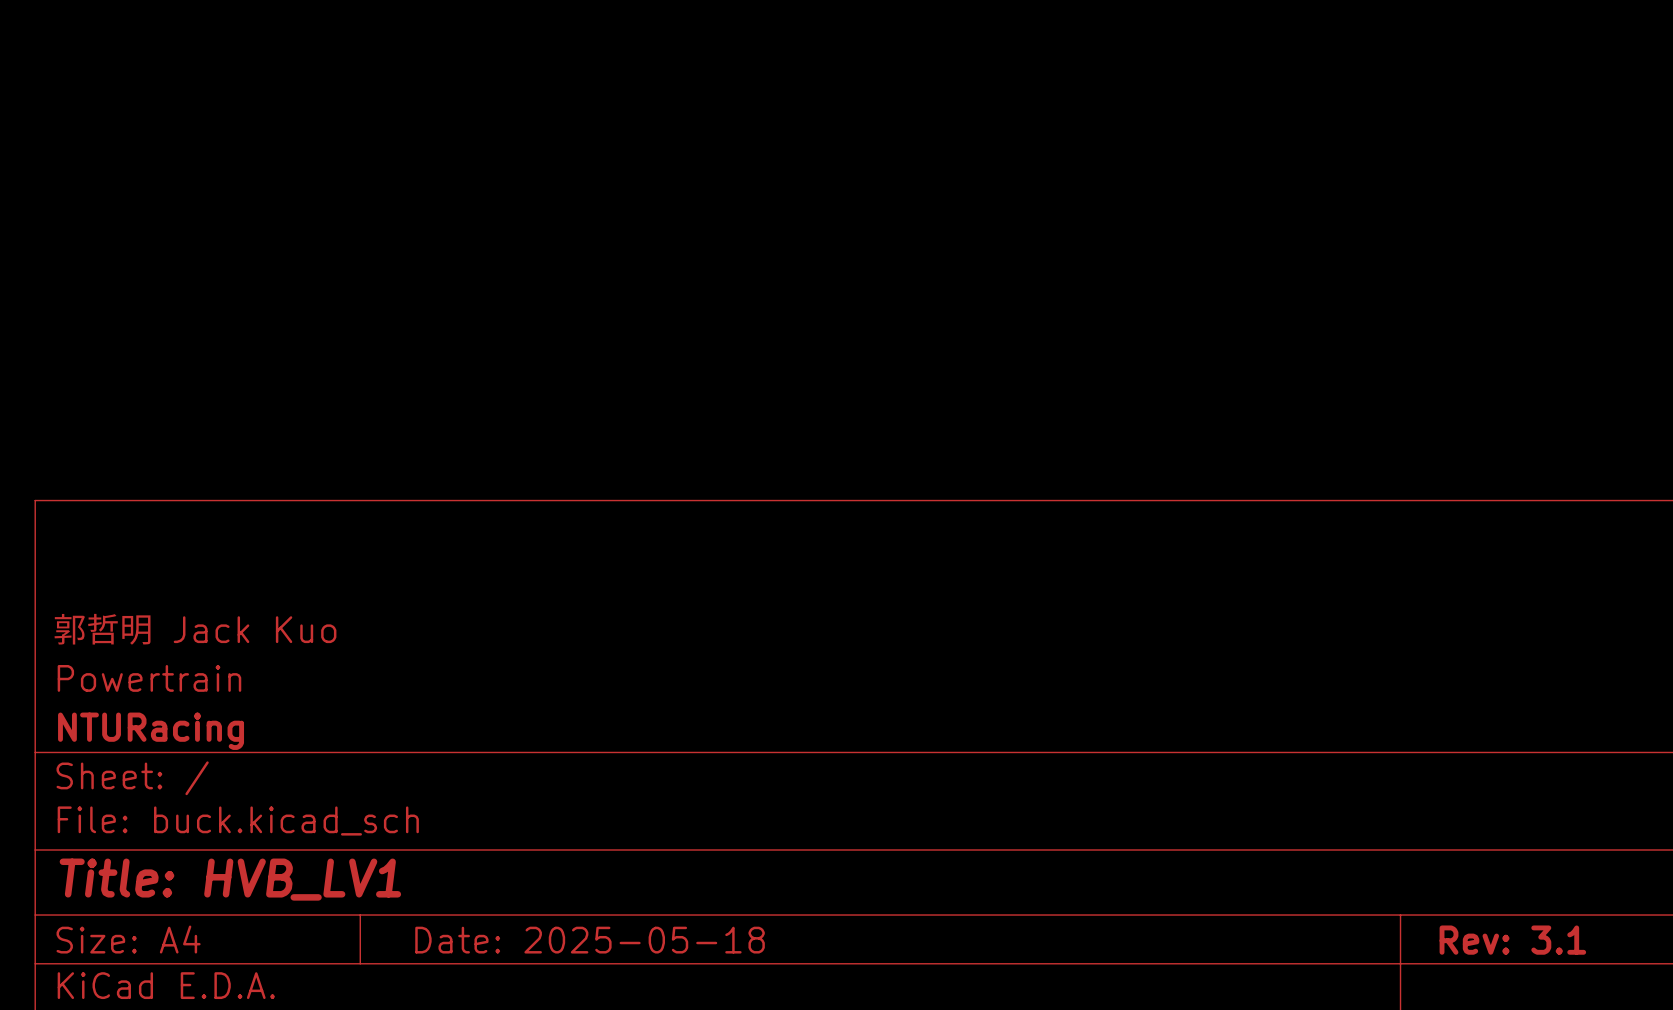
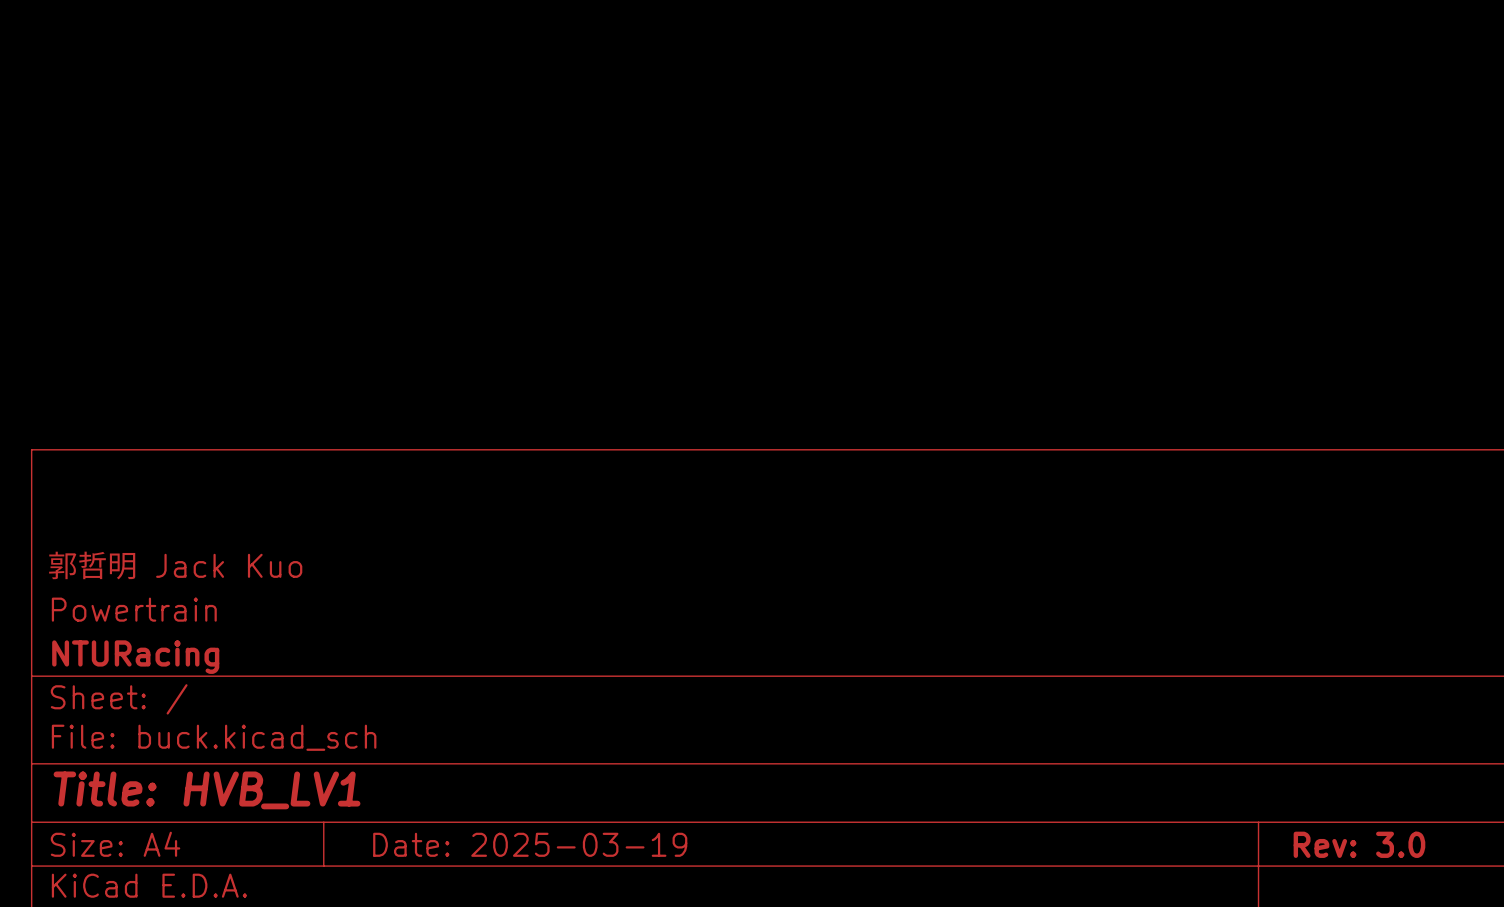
title block: Date: 2025-05-18 (590, 940) -> Date: 2025-03-19 (530, 844)
title block: Rev: 3.1 (1512, 940) -> Rev: 3.0 (1359, 844)

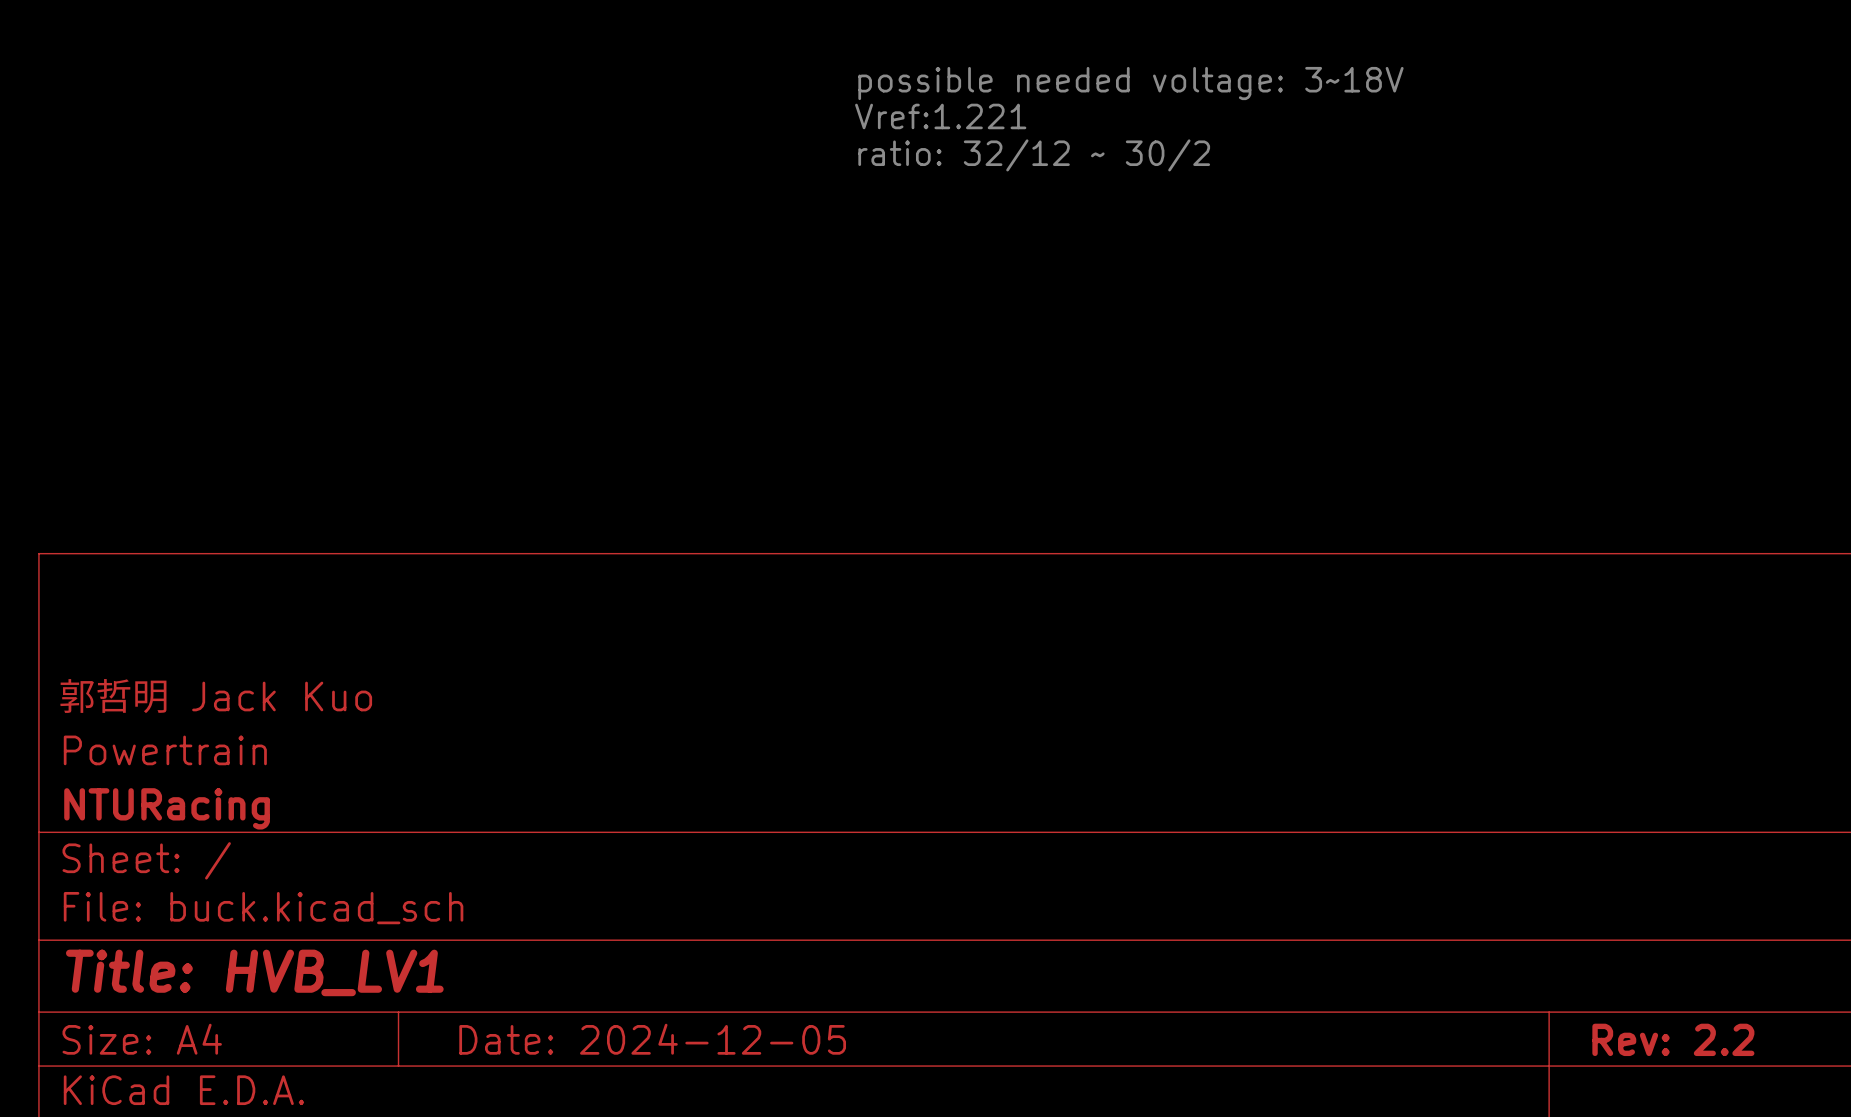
text: none -> possible needed voltage: 3~18V (1130, 83)
text: none -> Vref:1.221 (940, 116)
text: none -> ratio: 32/12 ~ 30/2 (1034, 155)
title block: Date: 2025-03-19 (530, 844) -> Date: 2024-12-05 (652, 1039)
title block: Rev: 3.0 (1359, 844) -> Rev: 2.2 (1673, 1039)

